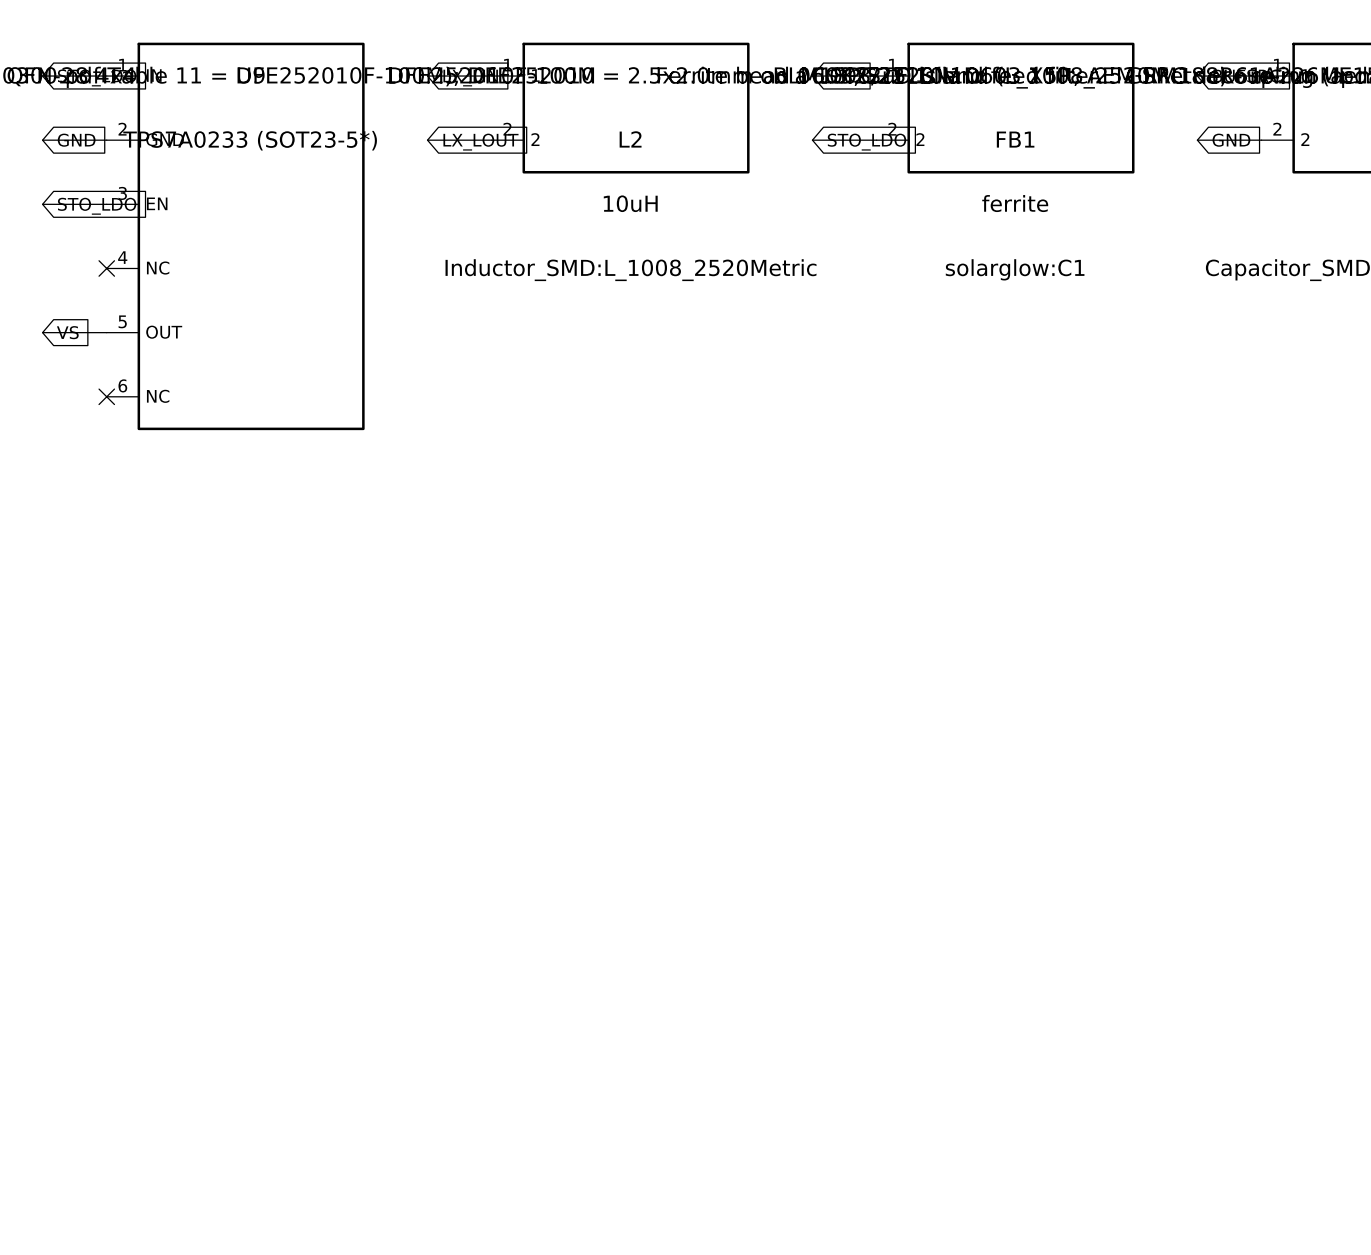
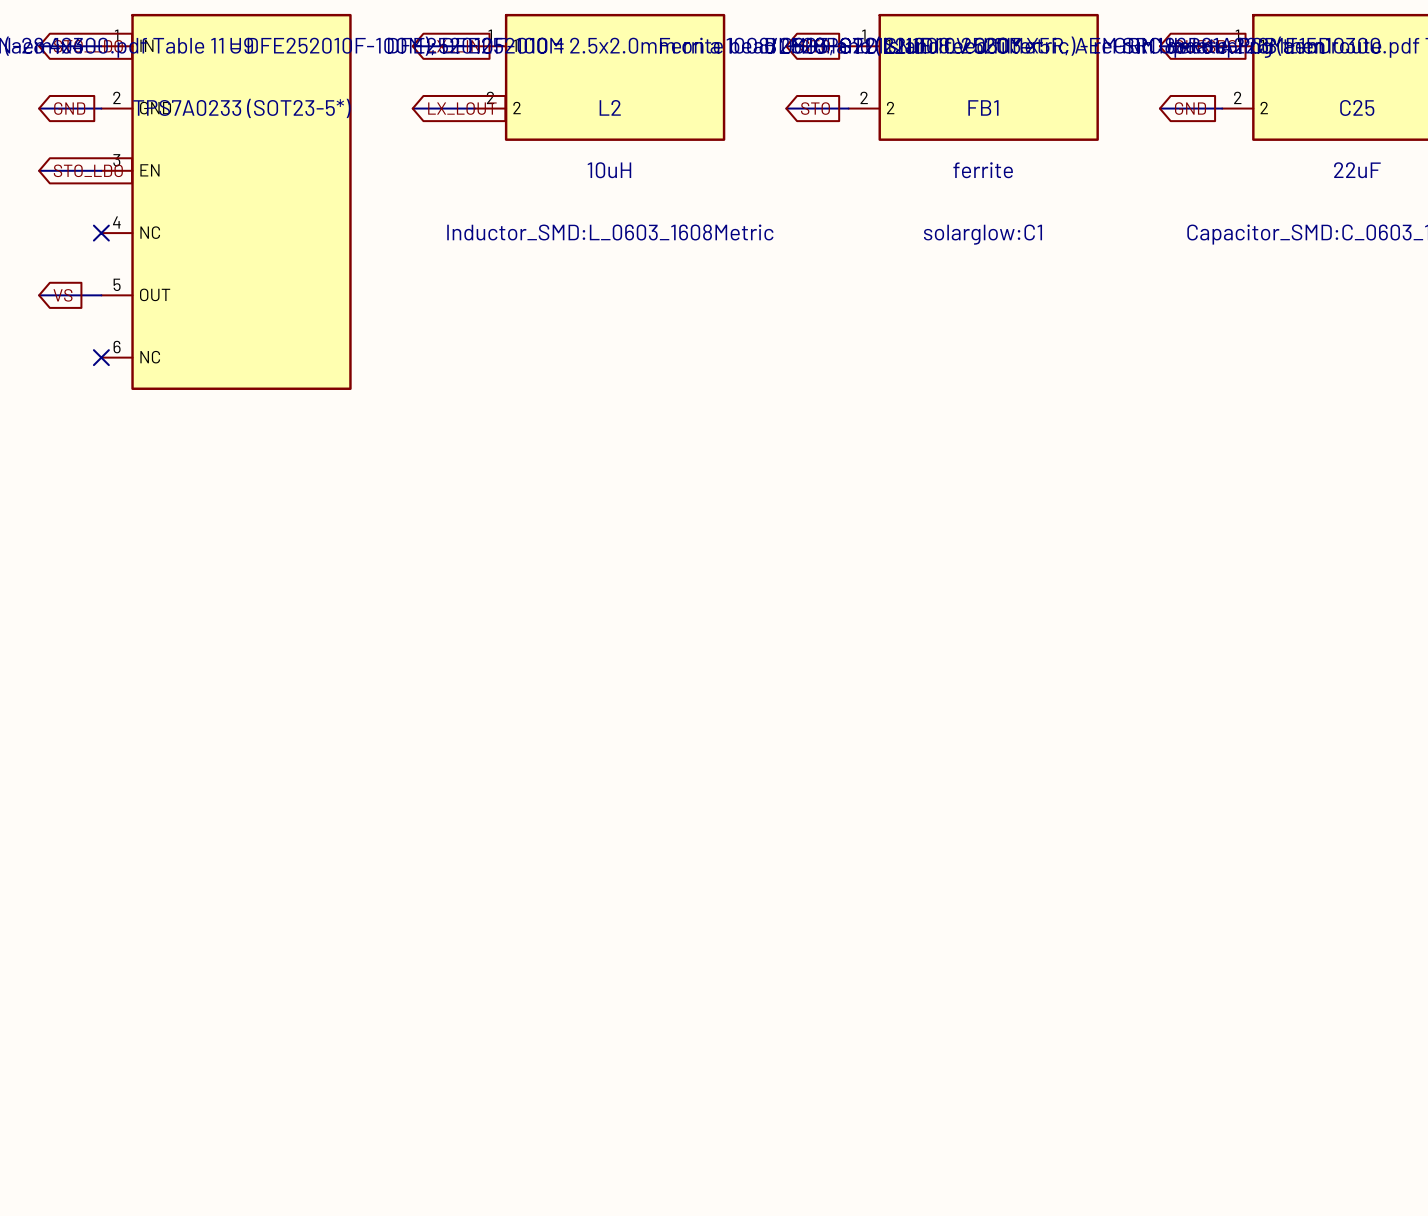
global label: STO_LDO (867, 142) -> STO (815, 108)
L2 text: Inductor_SMD:L_1008_2520Metric (631, 270) -> Inductor_SMD:L_0603_1608Metric (610, 232)

